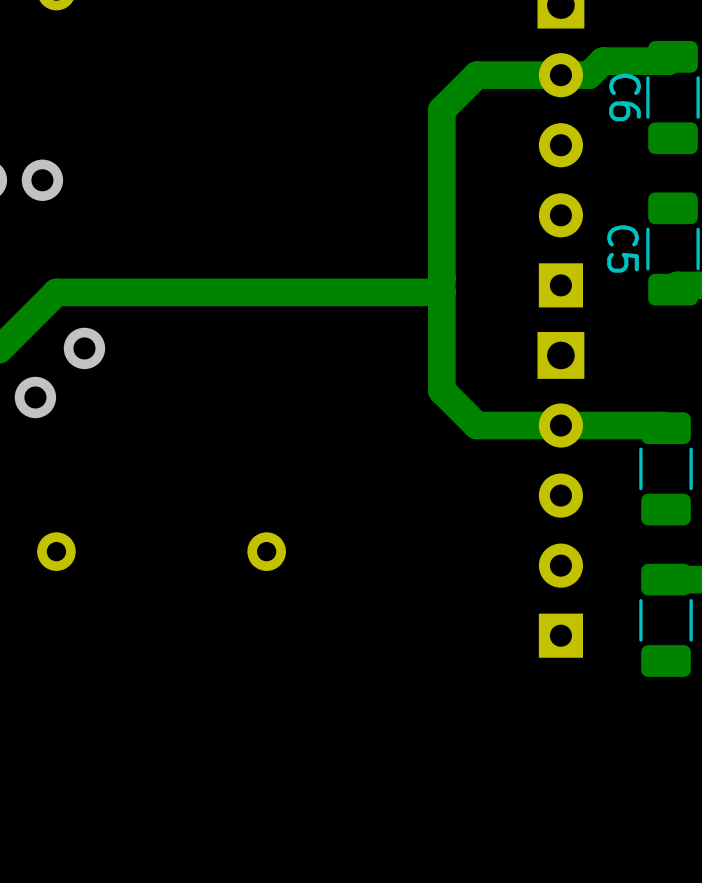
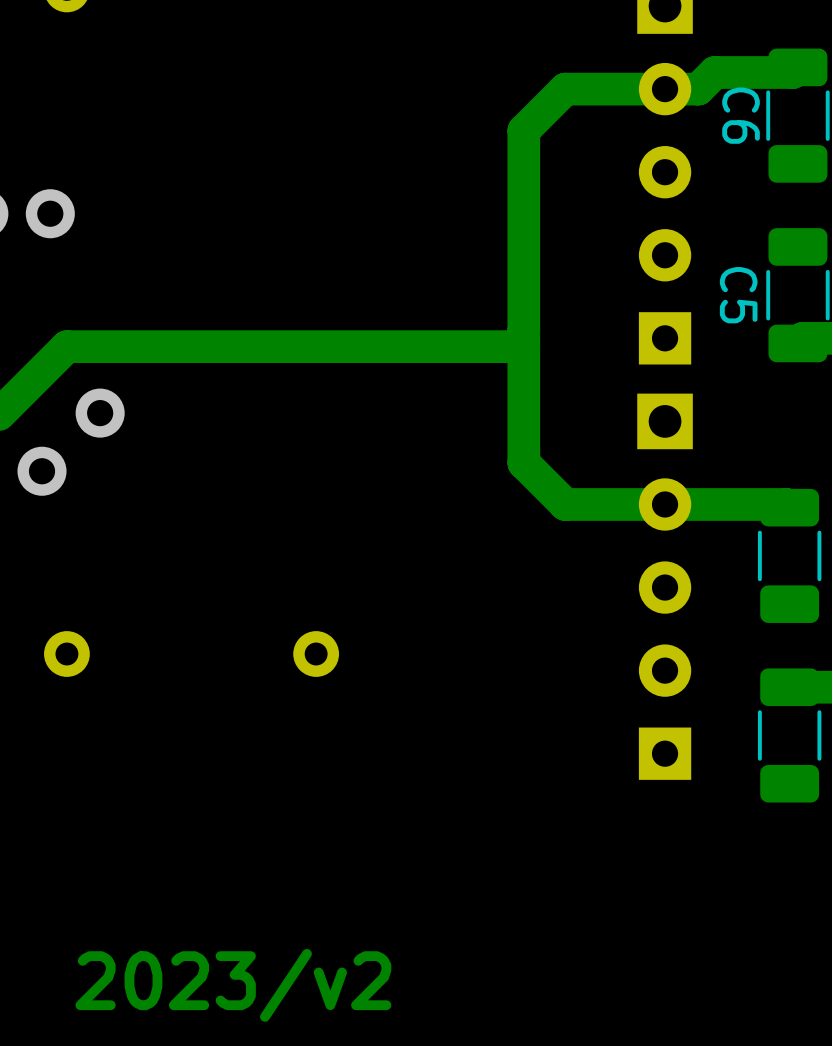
text: none -> 2023/v2 (233, 985)

